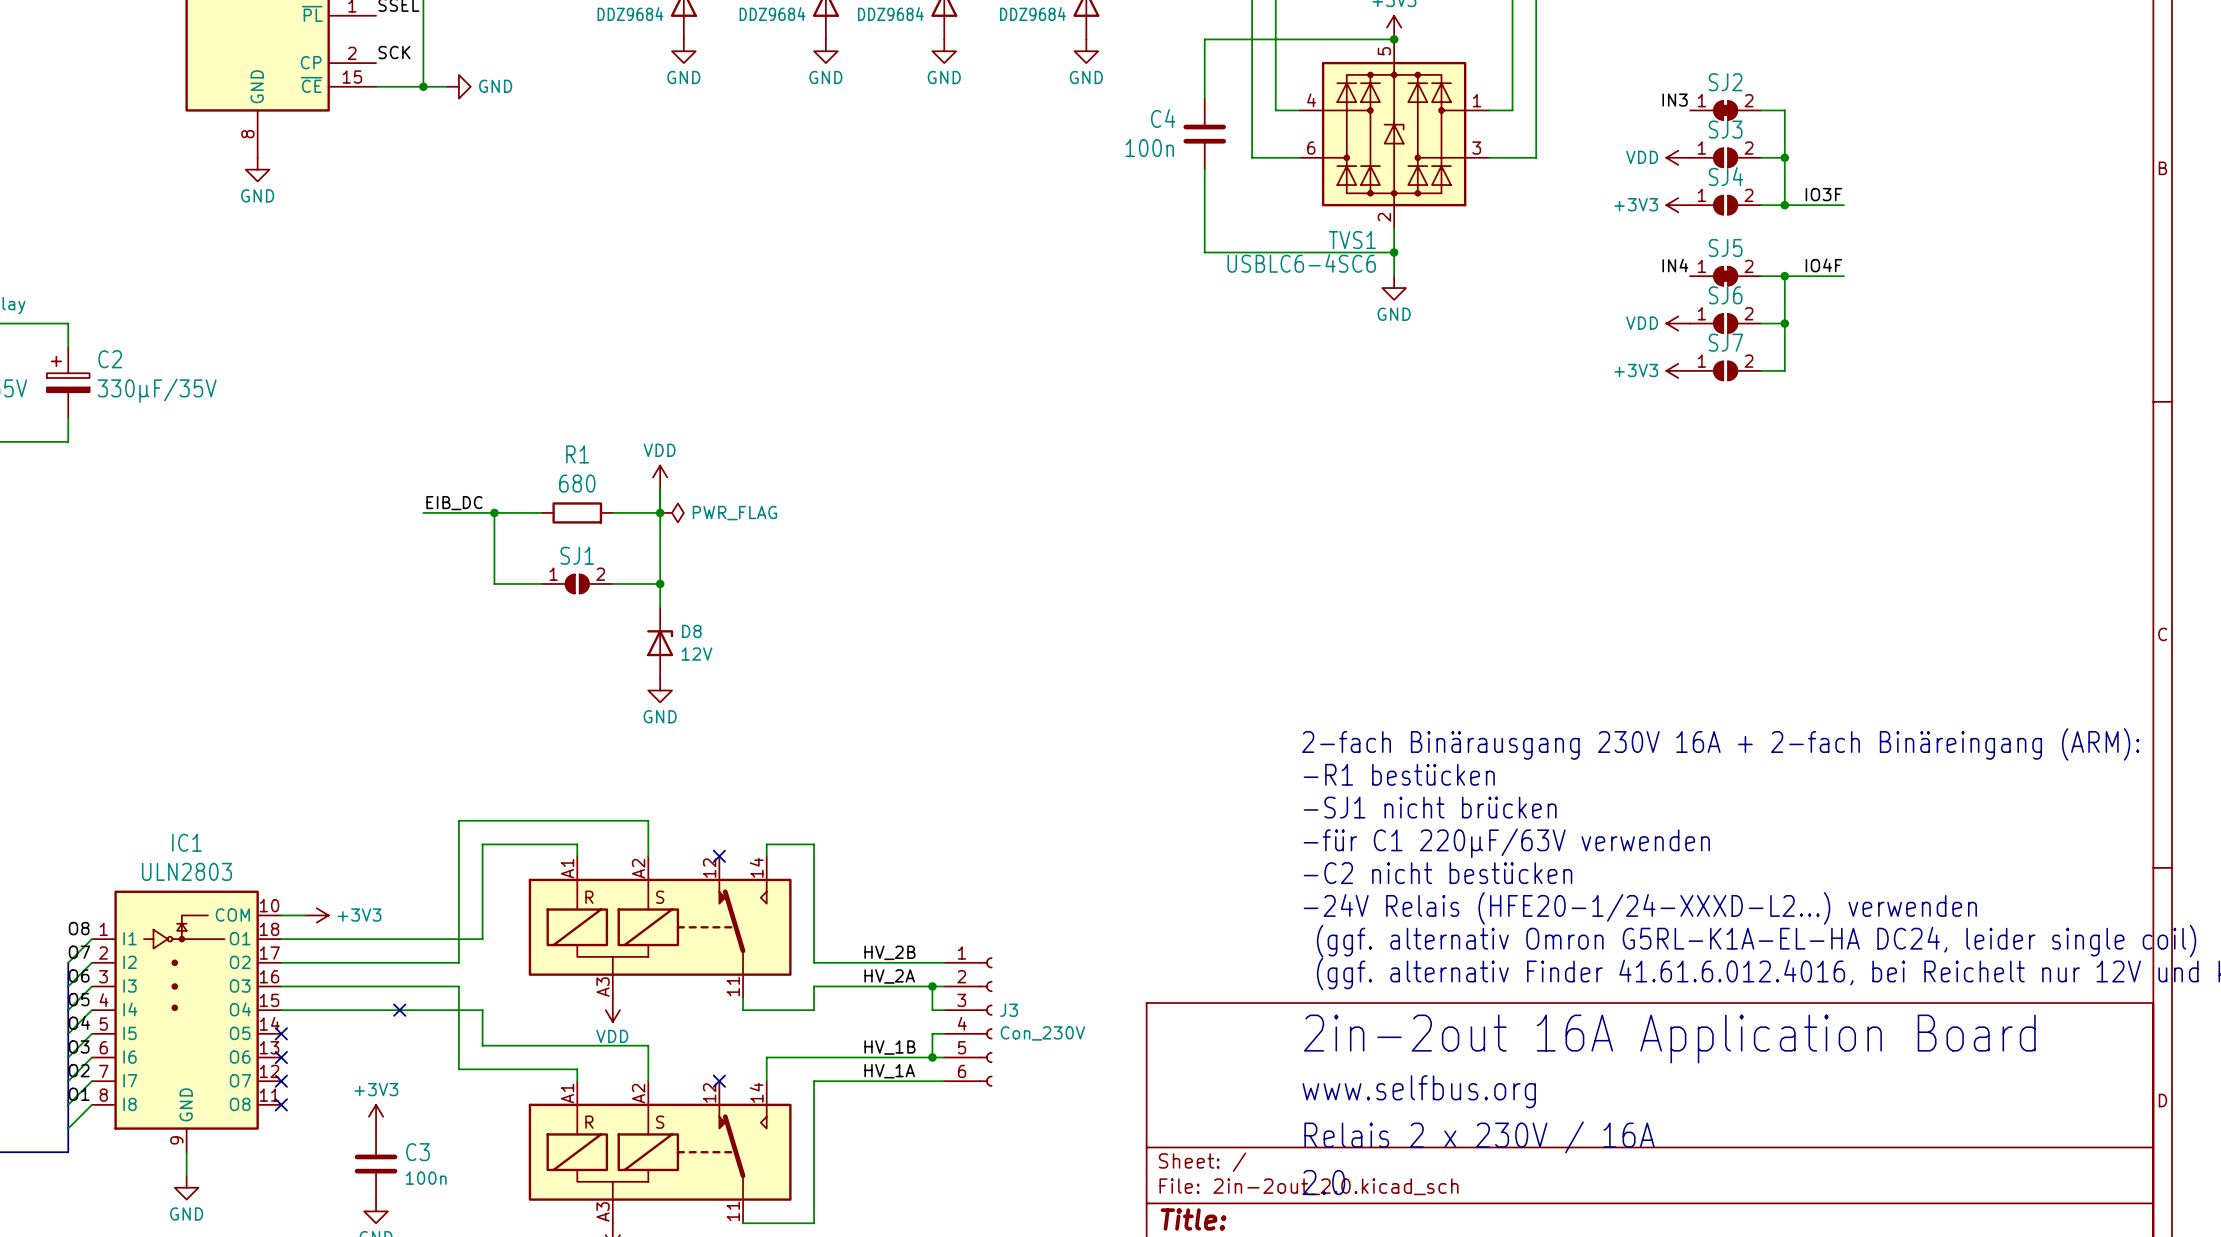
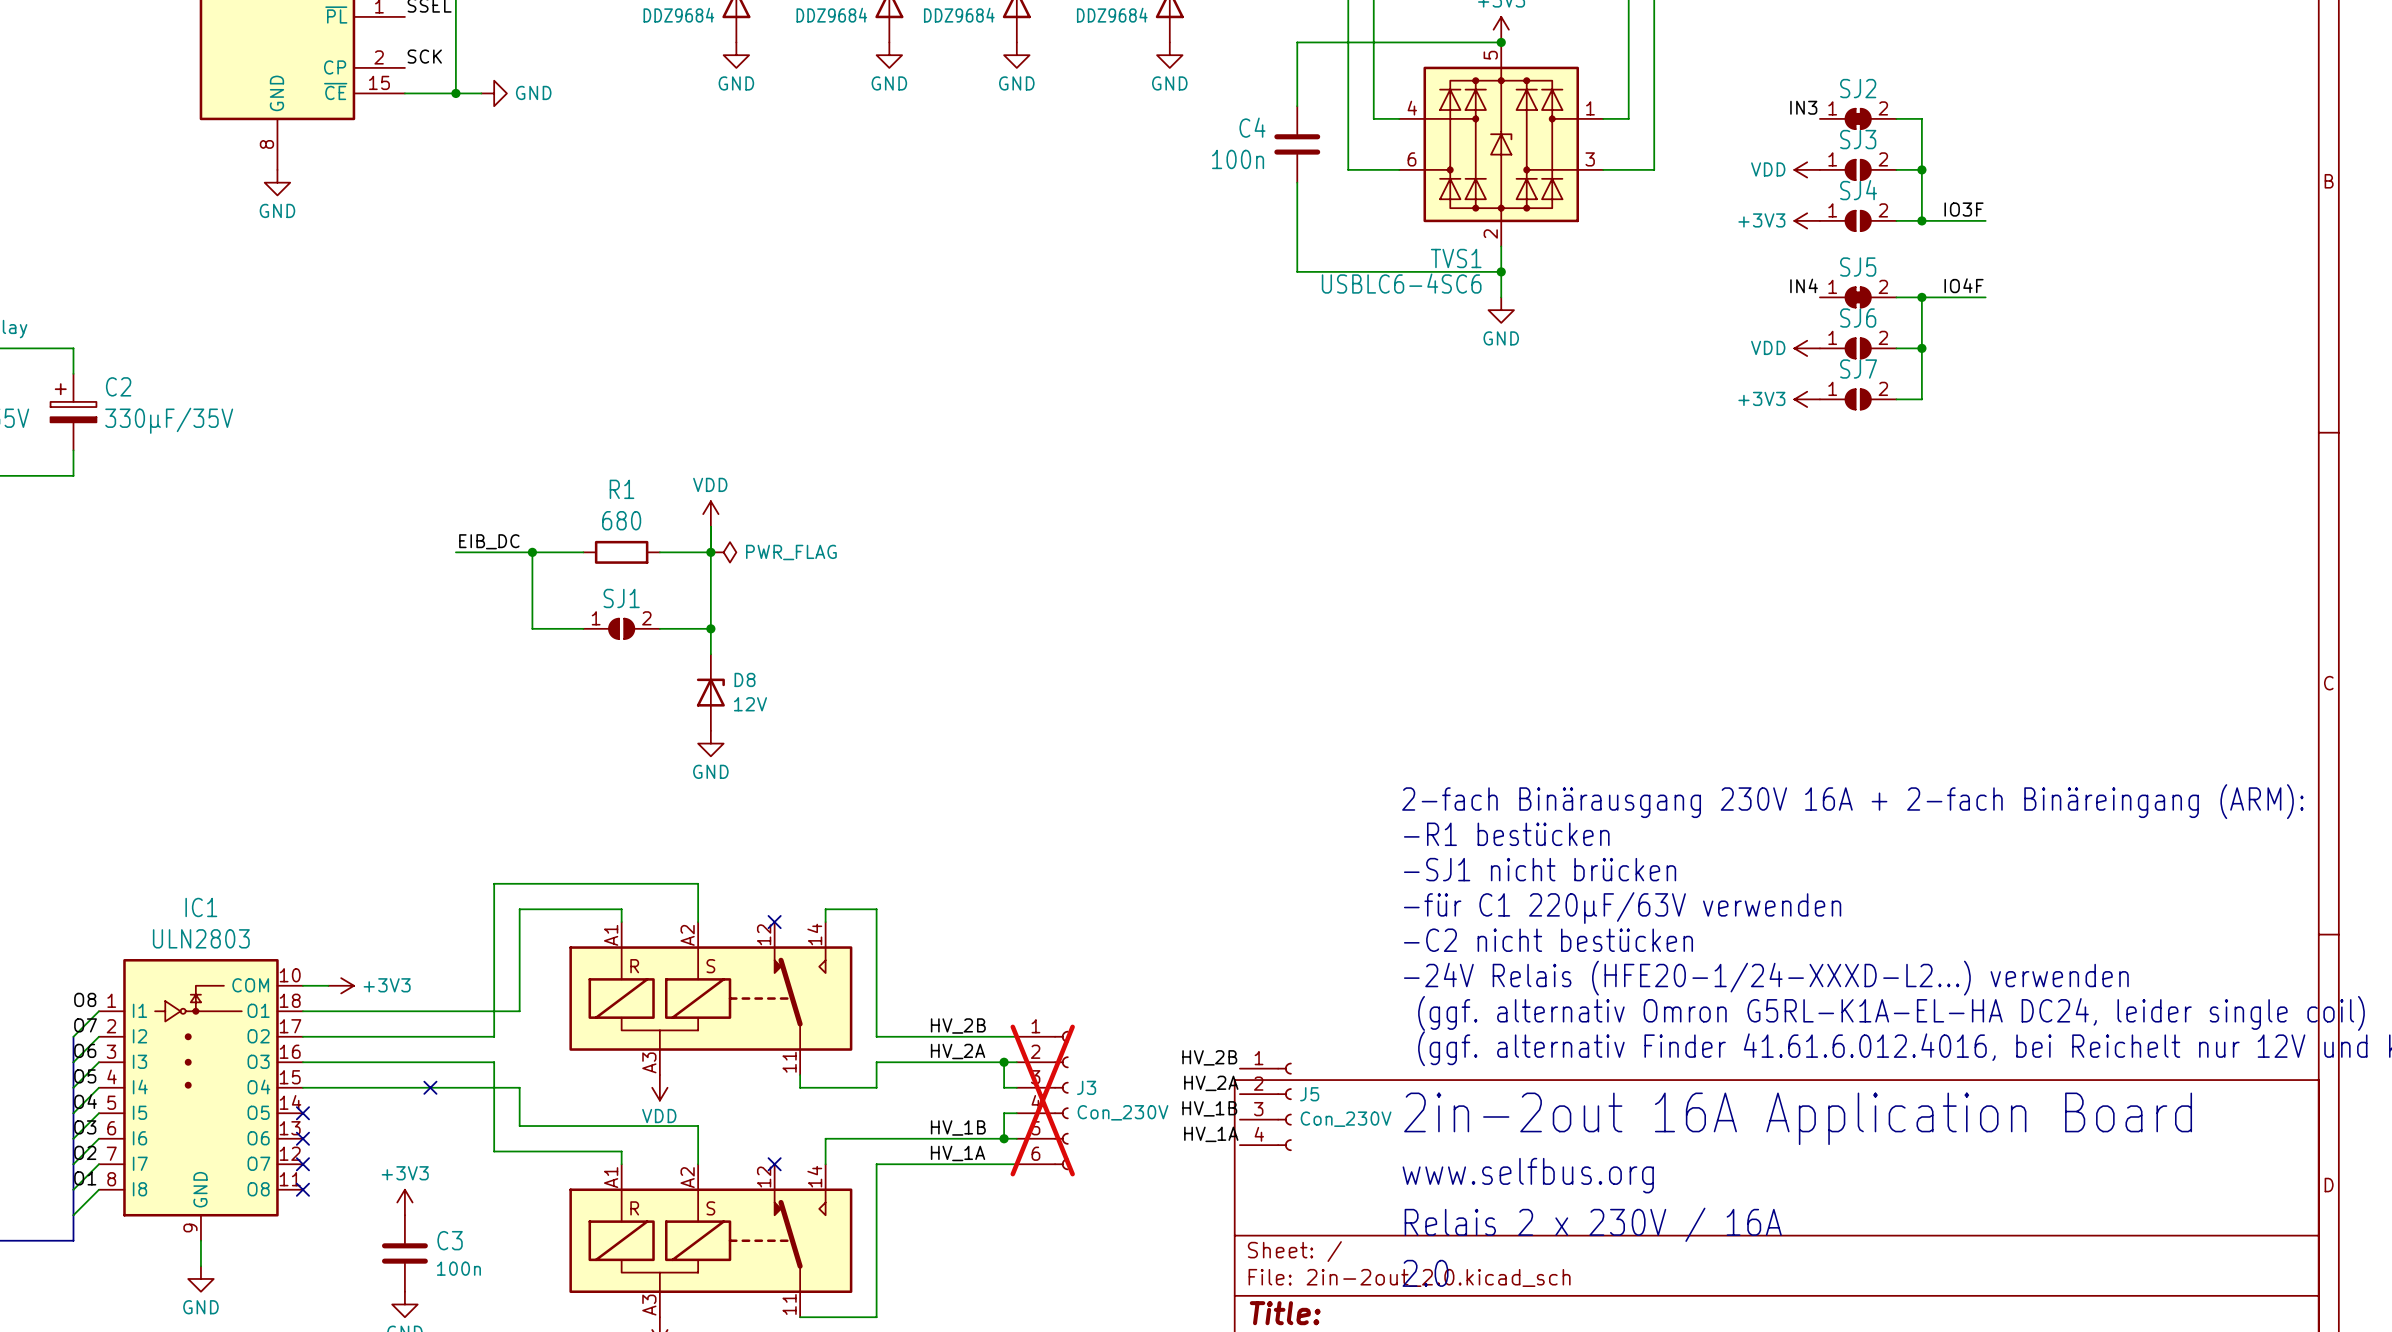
label: none -> HV_2B (1209, 1057)
label: none -> HV_2A (1211, 1083)
J3 do-not-place cross: none -> (1042, 1100)
J5: none -> Con_230V (1265, 1106)
label: none -> HV_1B (1209, 1108)
label: none -> HV_1A (1211, 1134)

